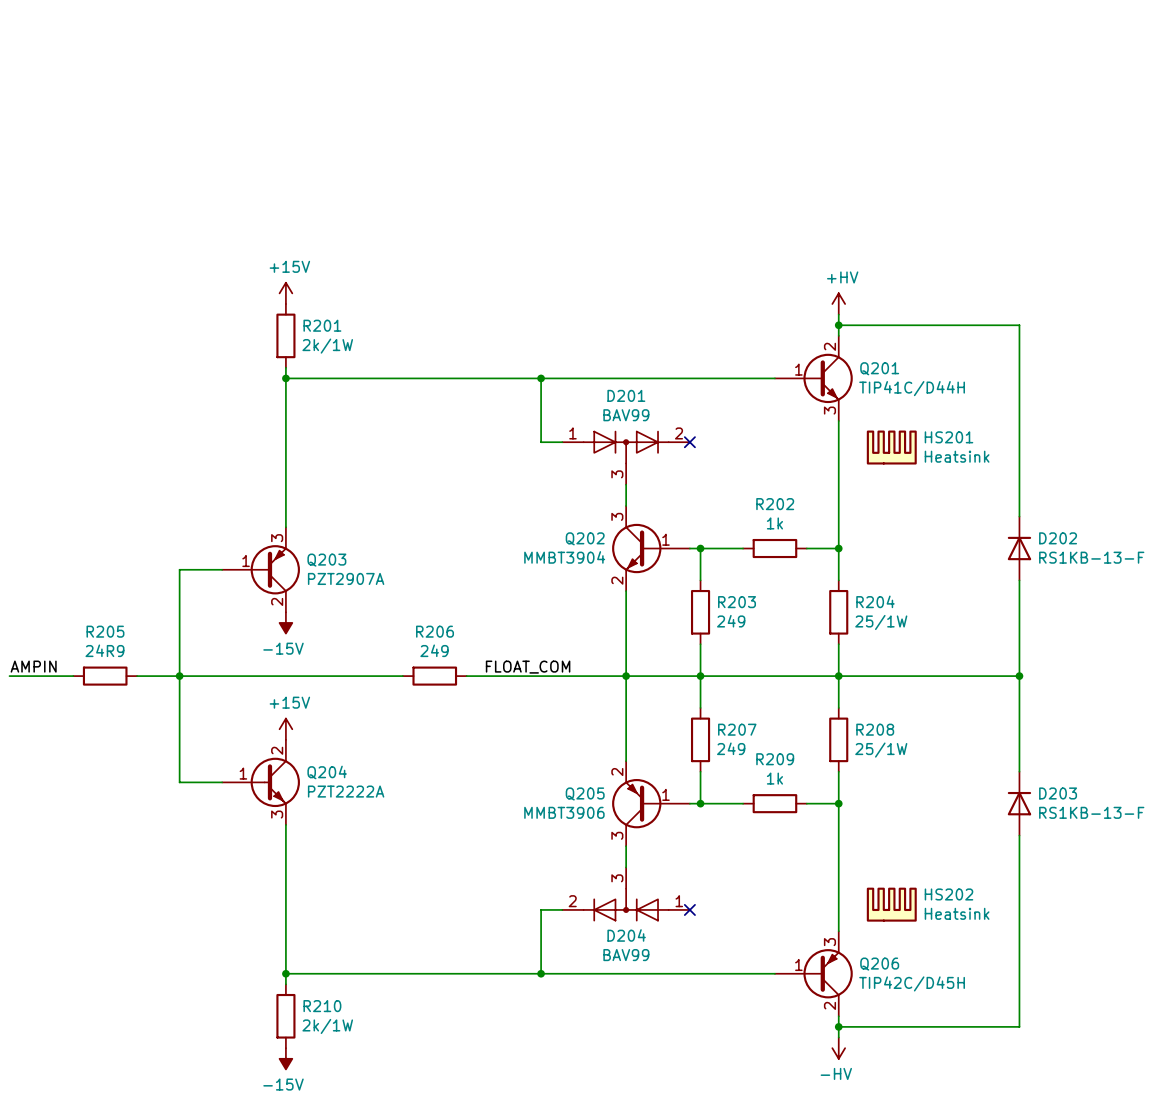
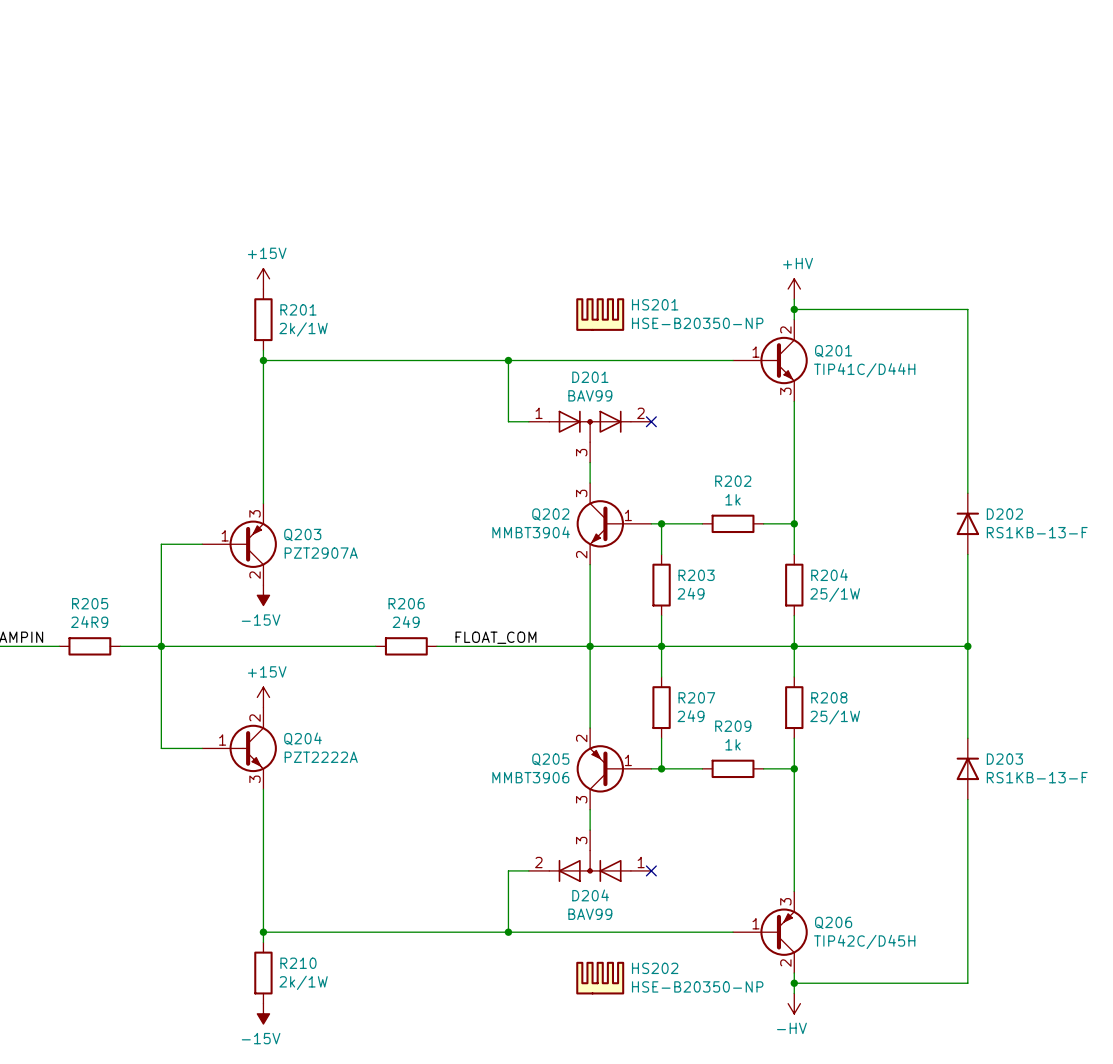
HS201 position: (891, 447) -> (600, 314)
HS201 value: Heatsink (957, 456) -> HSE-B20350-NP (697, 323)
HS202 position: (891, 904) -> (600, 978)
HS202 value: Heatsink (957, 913) -> HSE-B20350-NP (697, 986)

